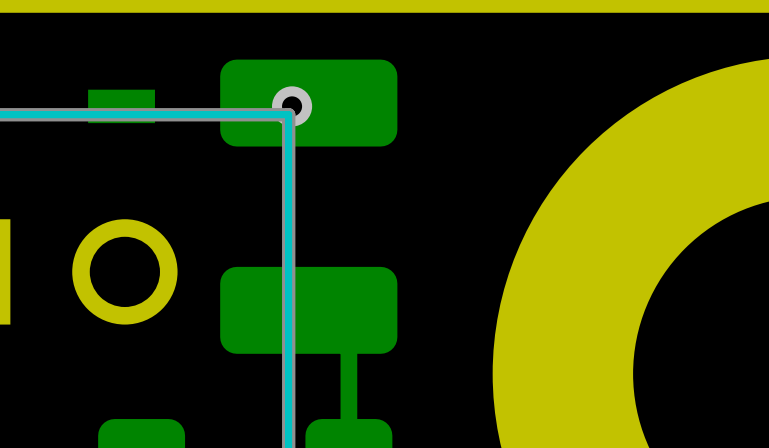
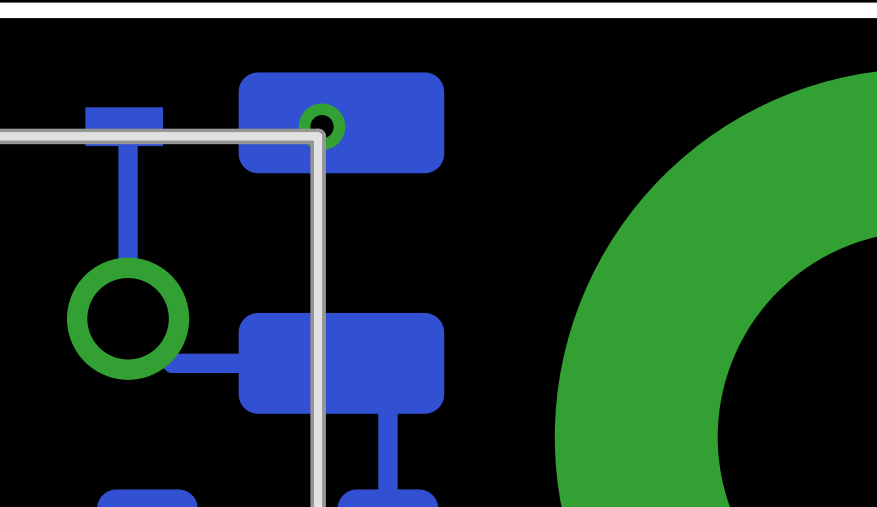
bottom track: none -> (124, 126) (128, 130) (128, 318) (172, 363) (341, 363)

